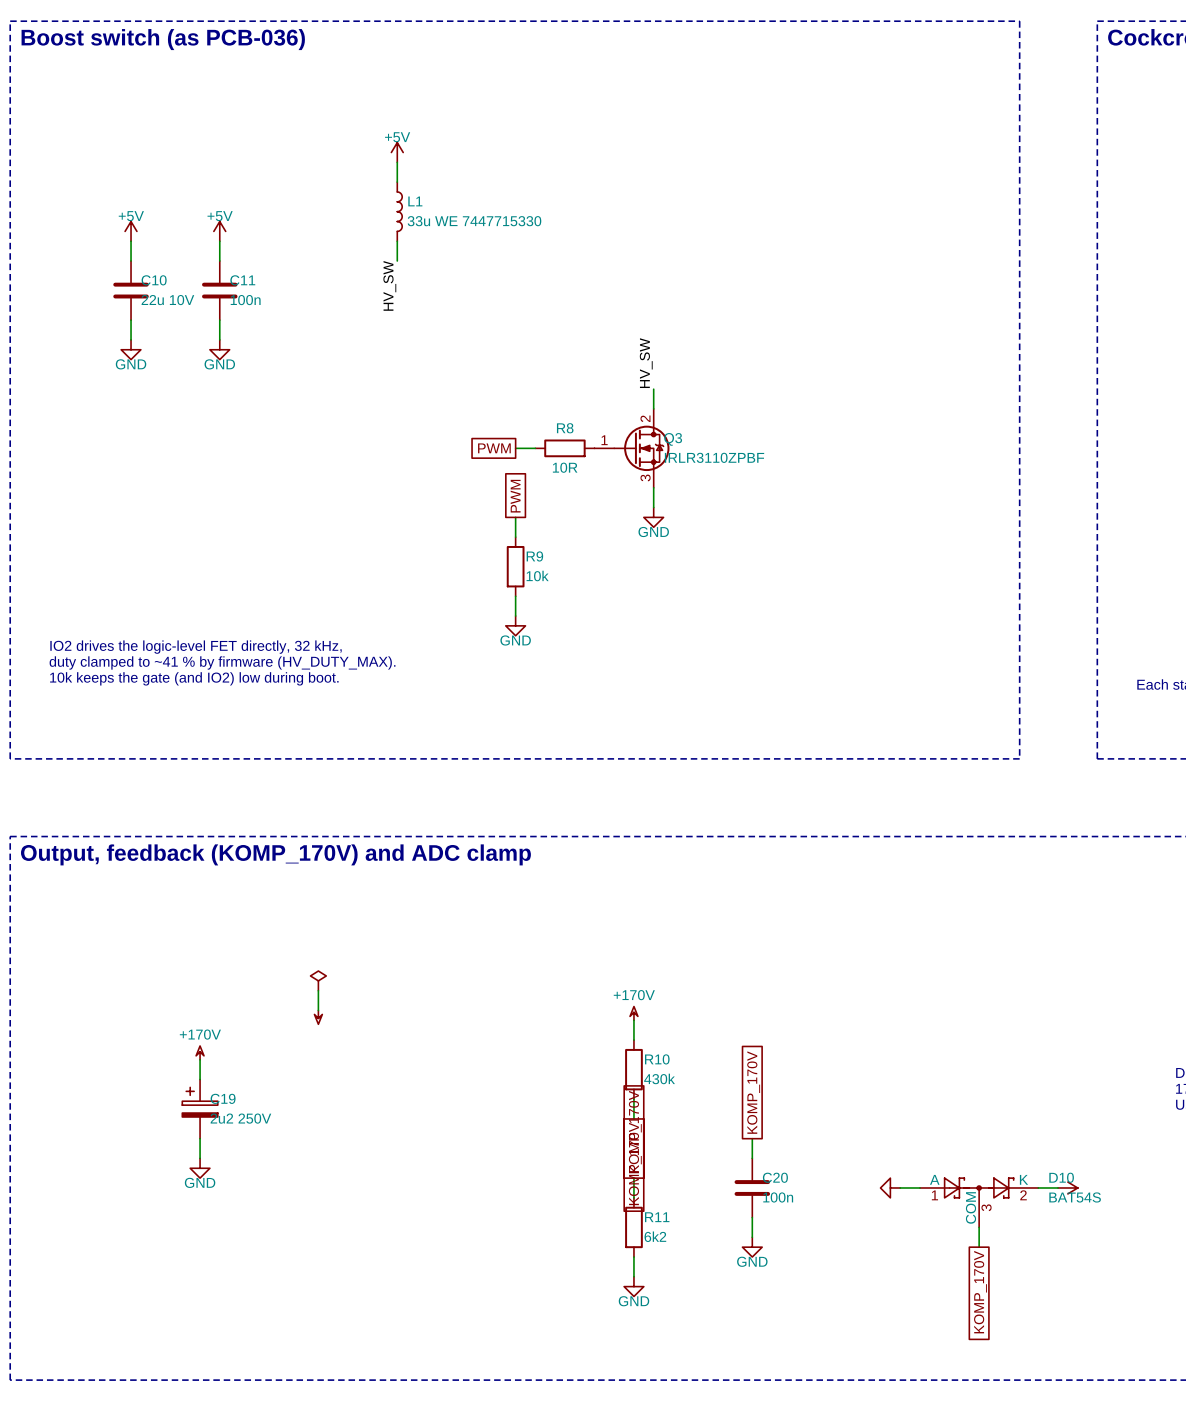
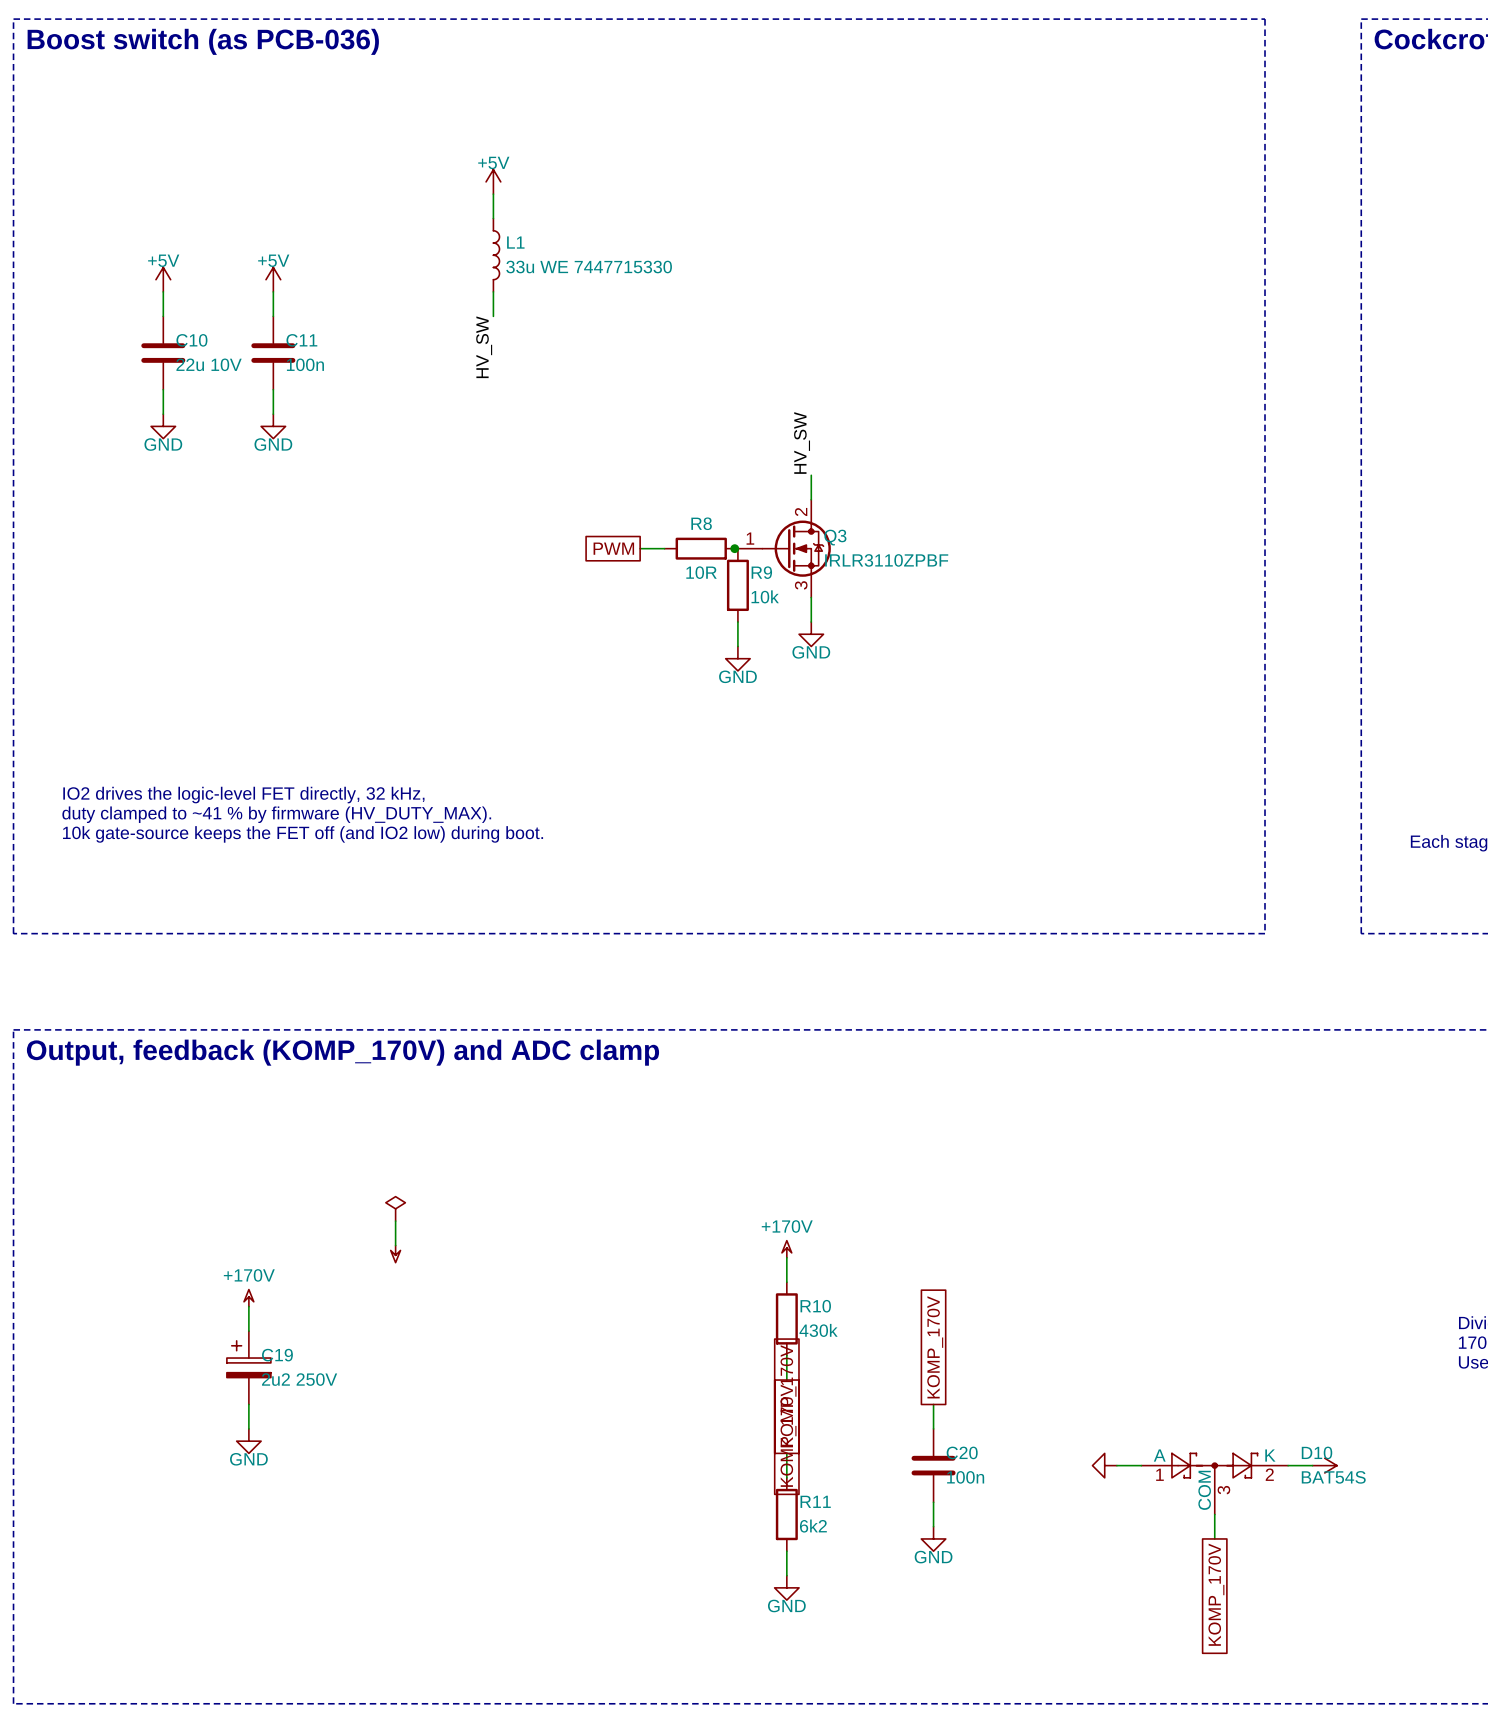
junction: none -> (734, 548)
global label: PWM (515, 496) -> none
wire: (515, 517) (515, 537) -> (737, 622) (737, 646)
R9 position: (515, 566) -> (737, 585)
wire: (515, 596) (515, 616) -> none
power symbol position: GND (515, 625) -> GND (737, 658)
text: 10k keeps the gate (and IO2) low during boot. (194, 678) -> 10k gate-source keeps the FET off (and IO2 low) during boot. (303, 834)

